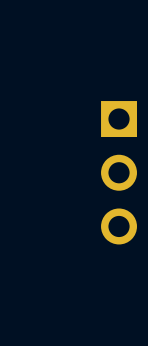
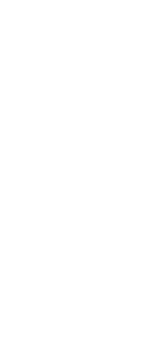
part: (119, 172) -> none

